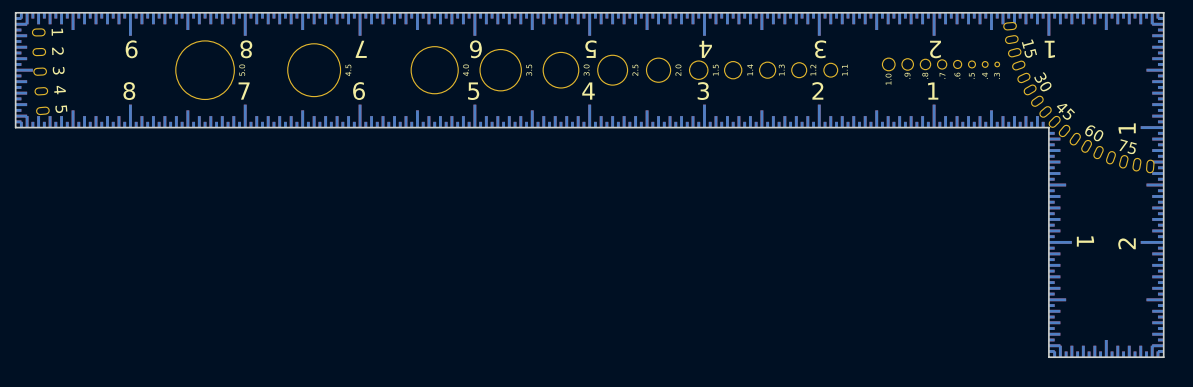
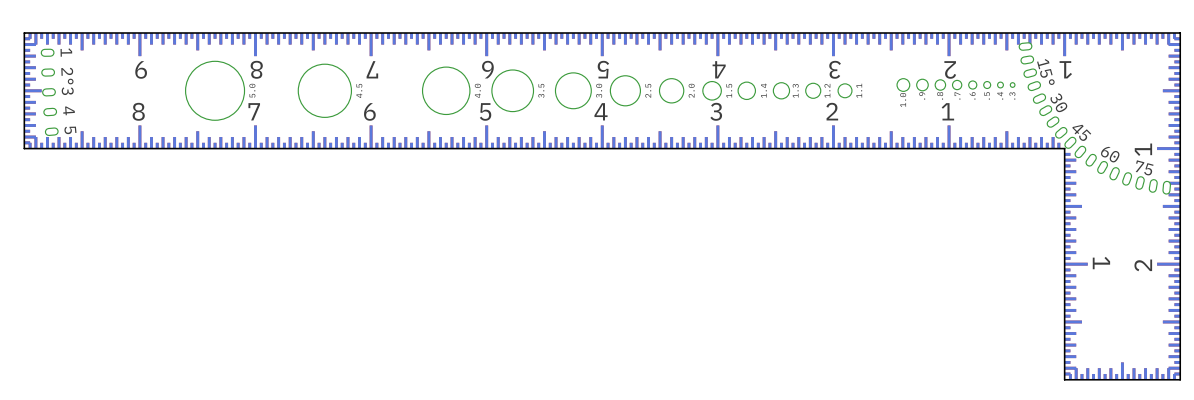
part text: 15 (1029, 48) -> none
part text: 2 (57, 51) -> none
part text: none -> 15° (1045, 72)
part text: none -> 2° (67, 76)

